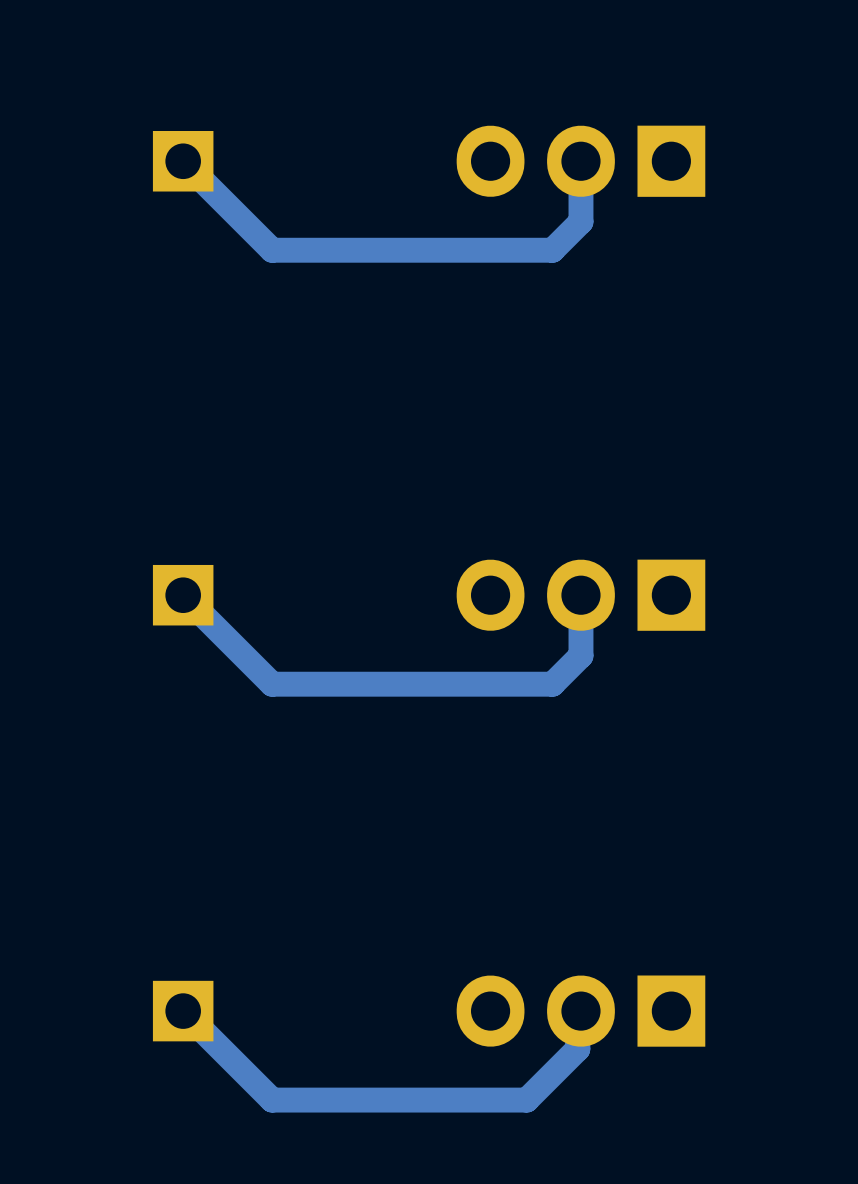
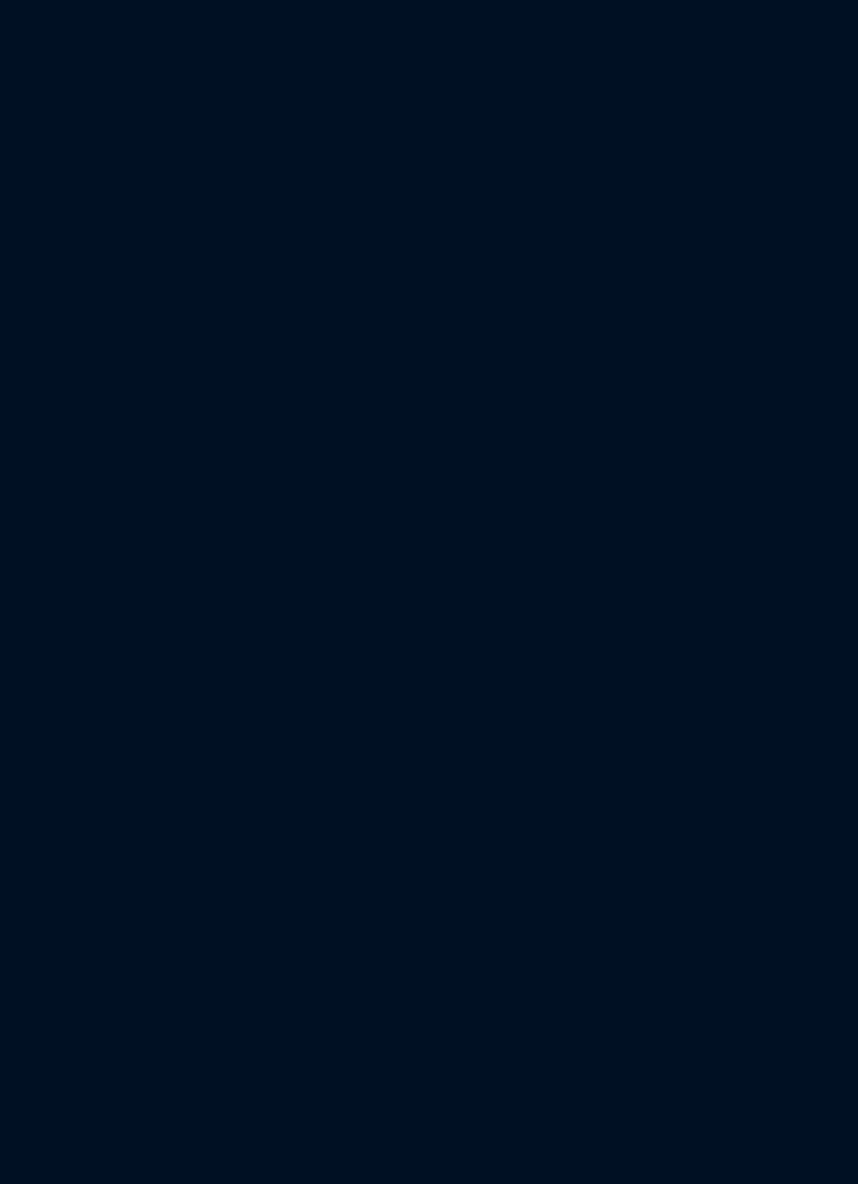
part: (183, 161) -> none
track: (580, 161) (580, 221) (552, 250) (272, 250) (183, 161) -> none
part: (580, 161) -> none
part: (183, 595) -> none
track: (580, 595) (580, 655) (552, 684) (272, 684) (183, 595) -> none
part: (580, 595) -> none
part: (183, 1011) -> none
track: (580, 1011) (577, 1014) (577, 1048) (526, 1100) (272, 1100) (183, 1011) -> none
part: (580, 1011) -> none

